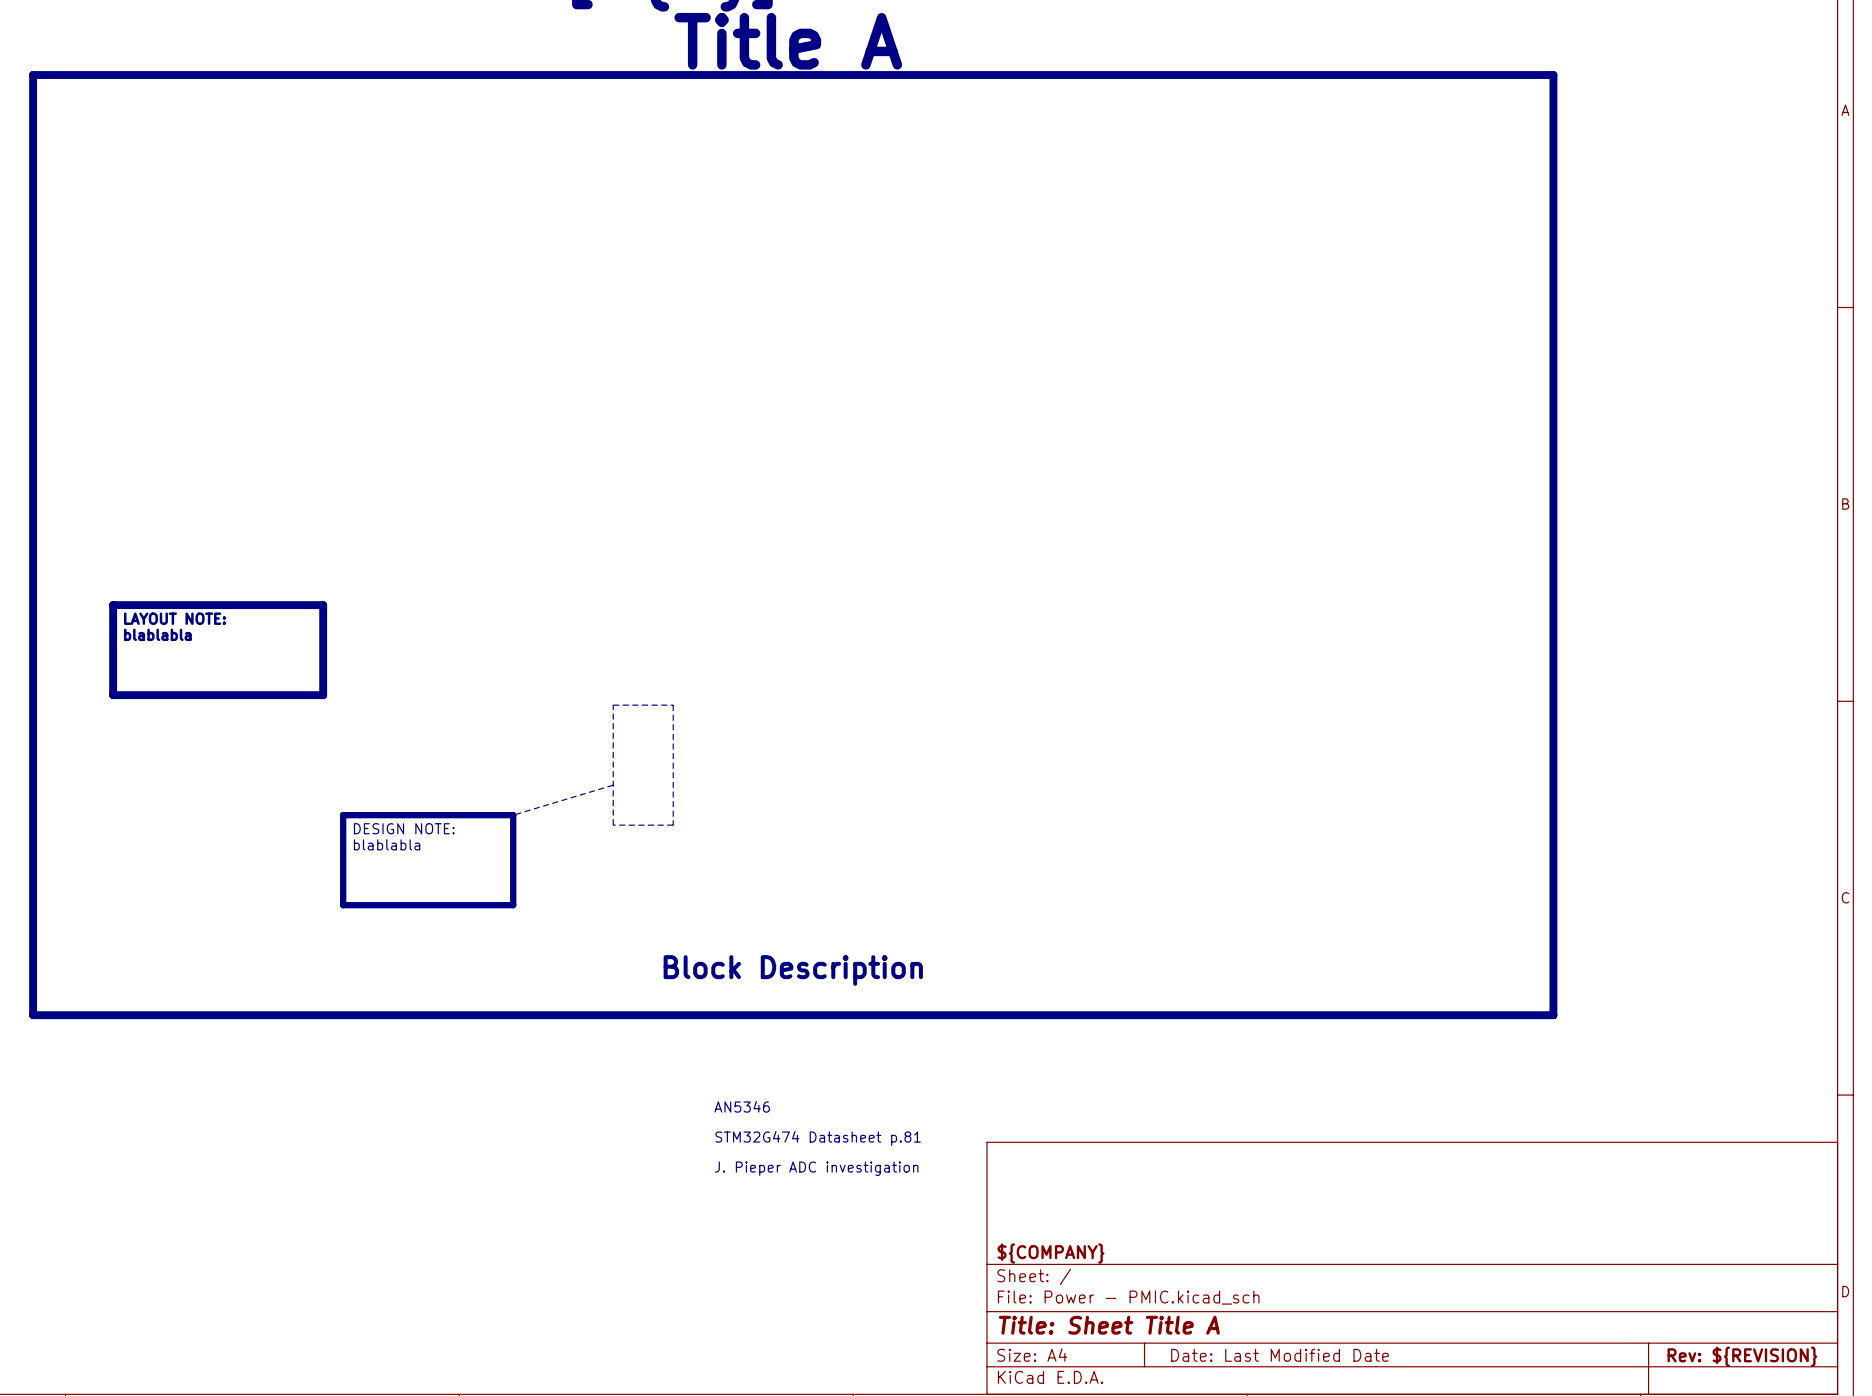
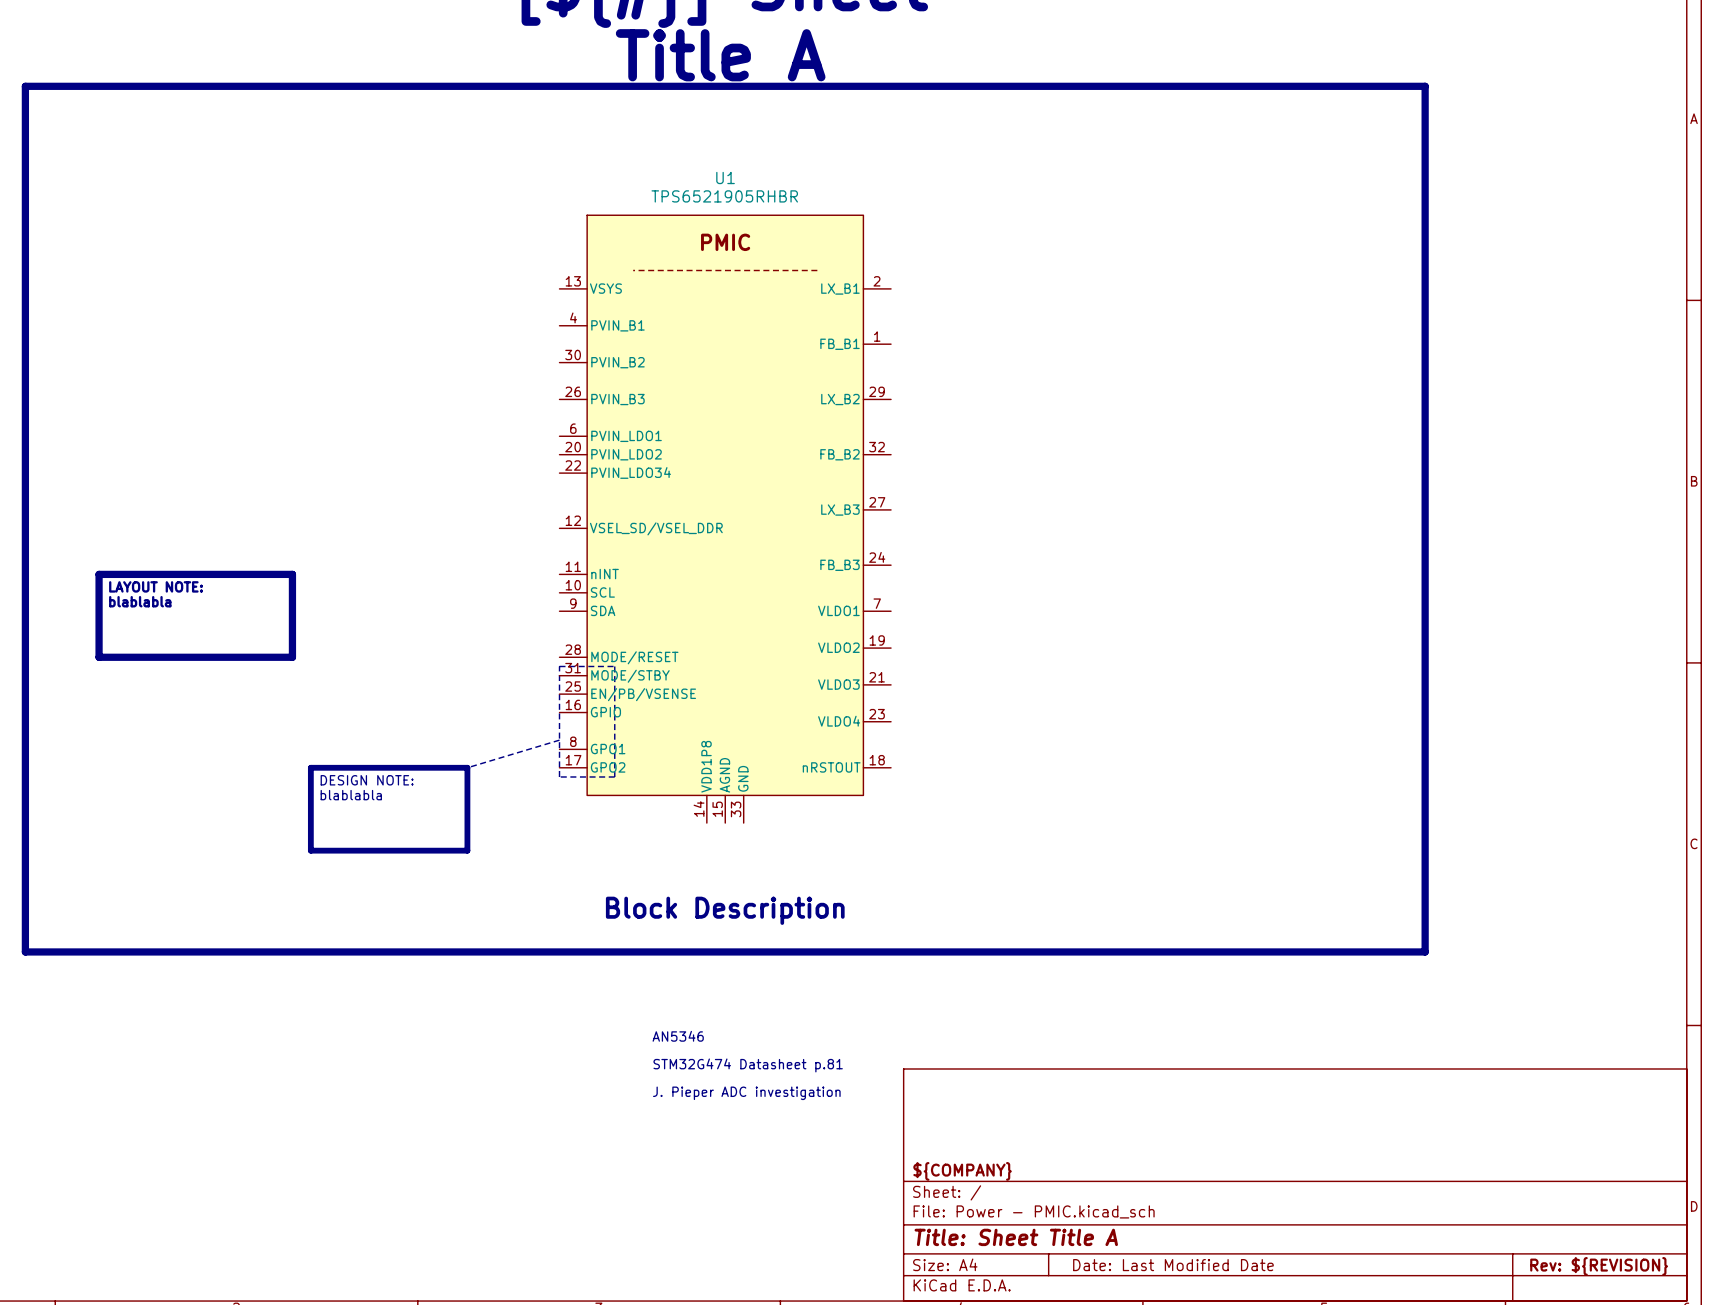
U1: none -> TPS6521905RHBR (725, 519)

